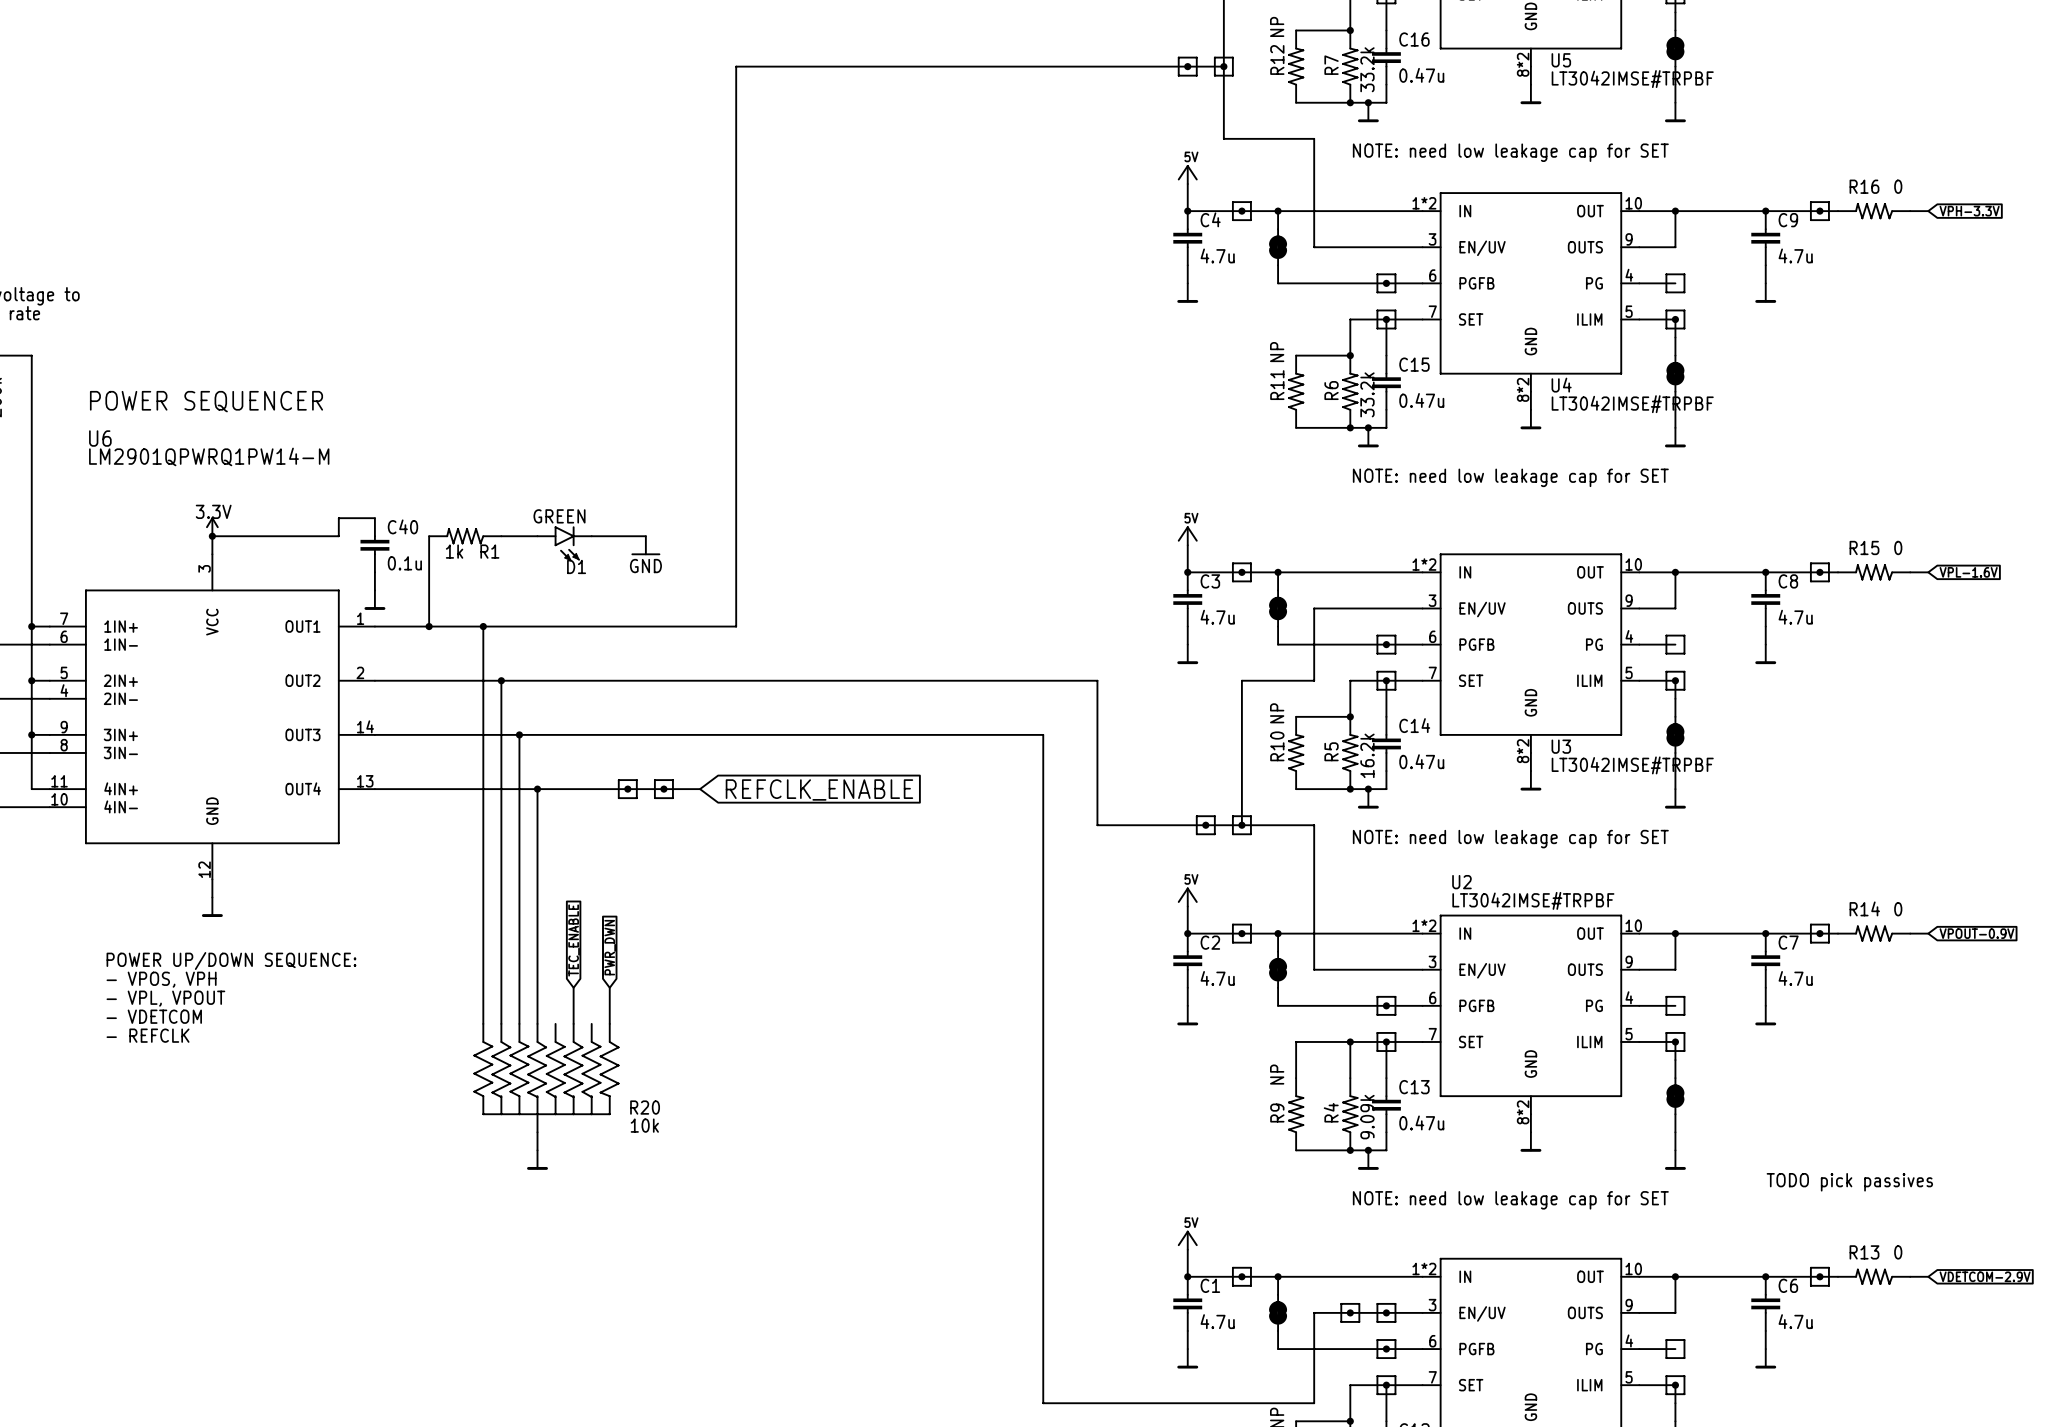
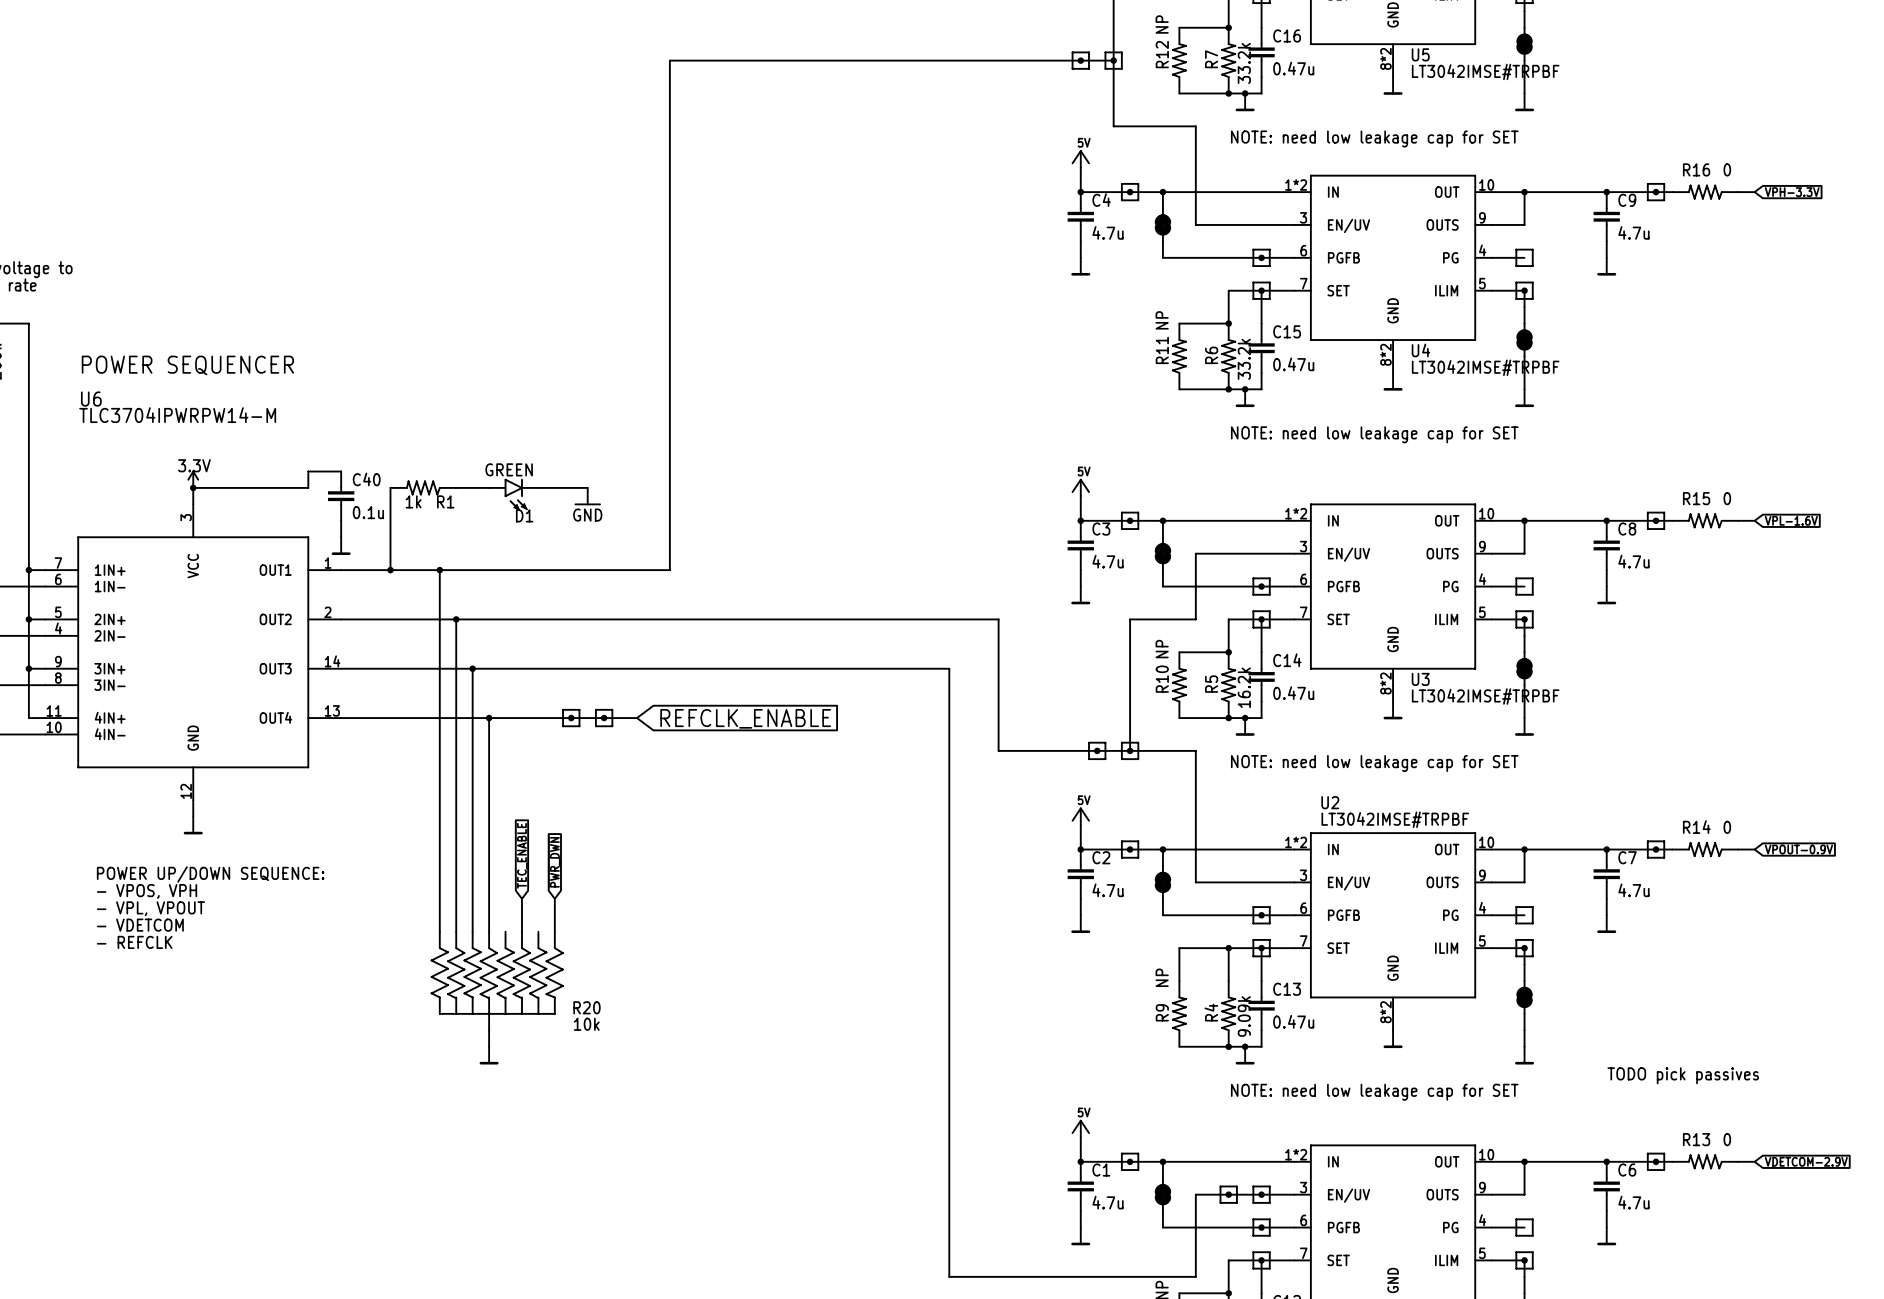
U6 value: LM2901QPWRQ1PW14-M (209, 456) -> TLC3704IPWRPW14-M (177, 415)

